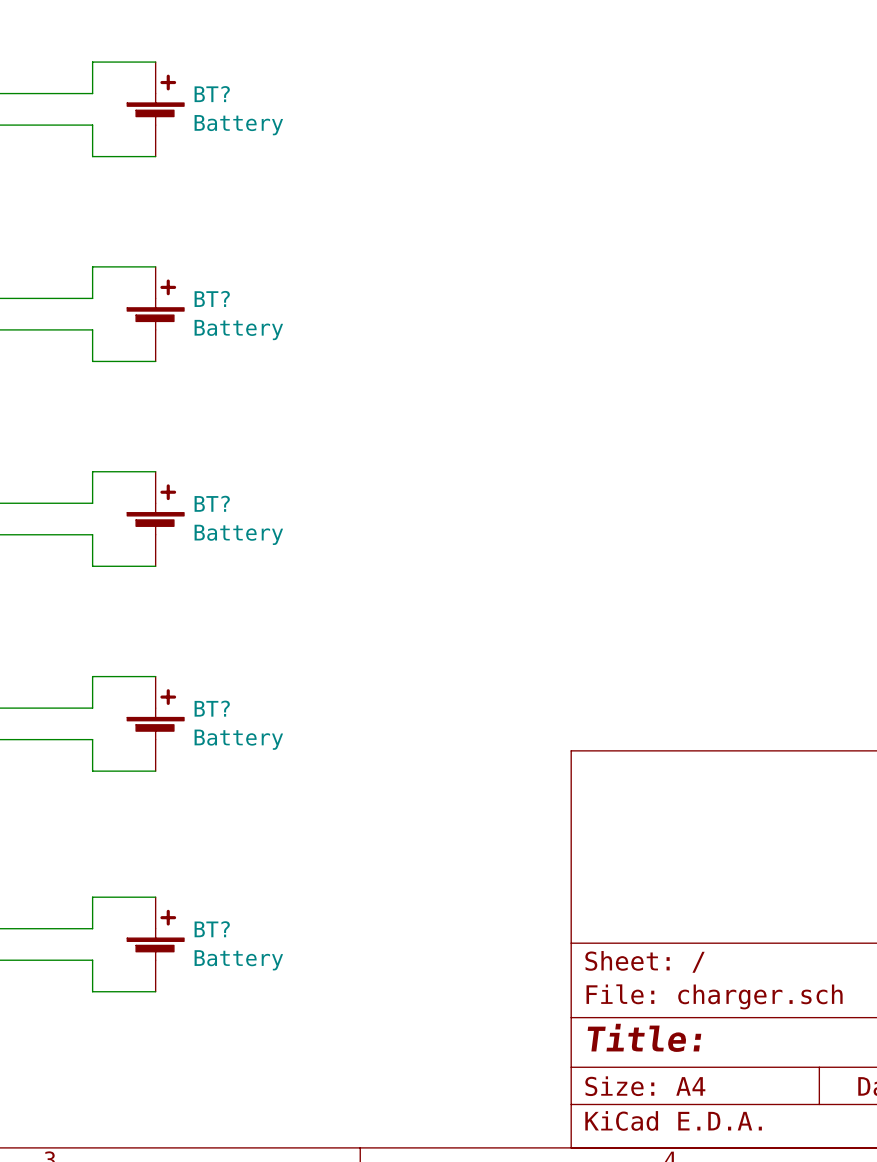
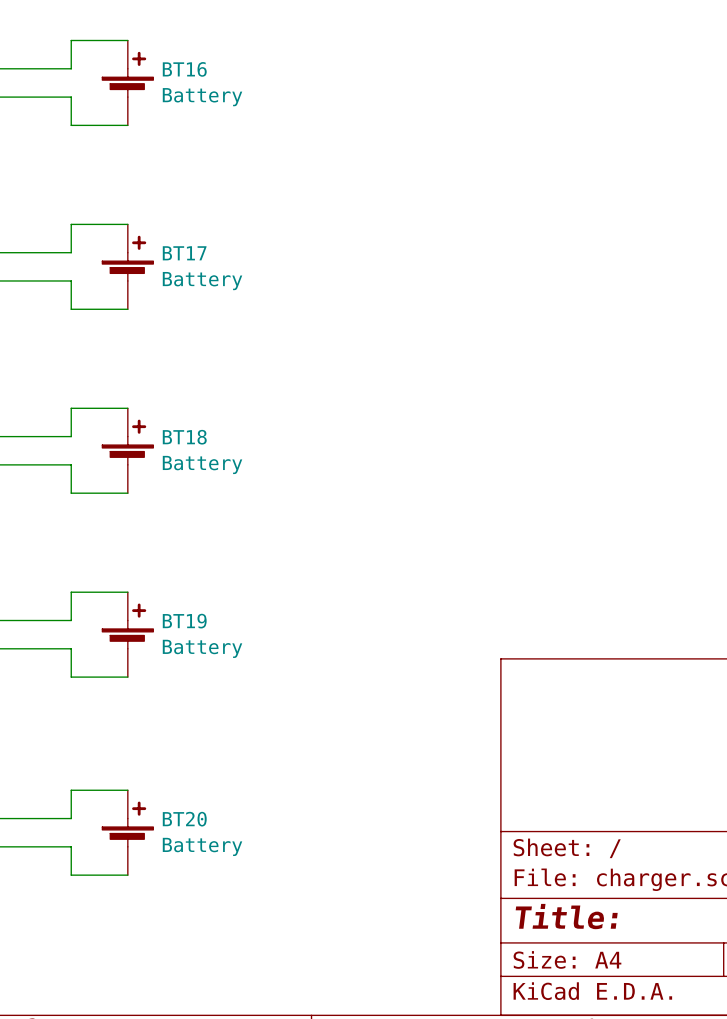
BT? name: BT? (212, 94) -> BT16 (184, 69)
BT? name: BT? (212, 298) -> BT17 (184, 253)
BT? name: BT? (212, 503) -> BT18 (184, 437)
BT? name: BT? (212, 708) -> BT19 (184, 621)
BT? name: BT? (212, 929) -> BT20 (184, 819)

